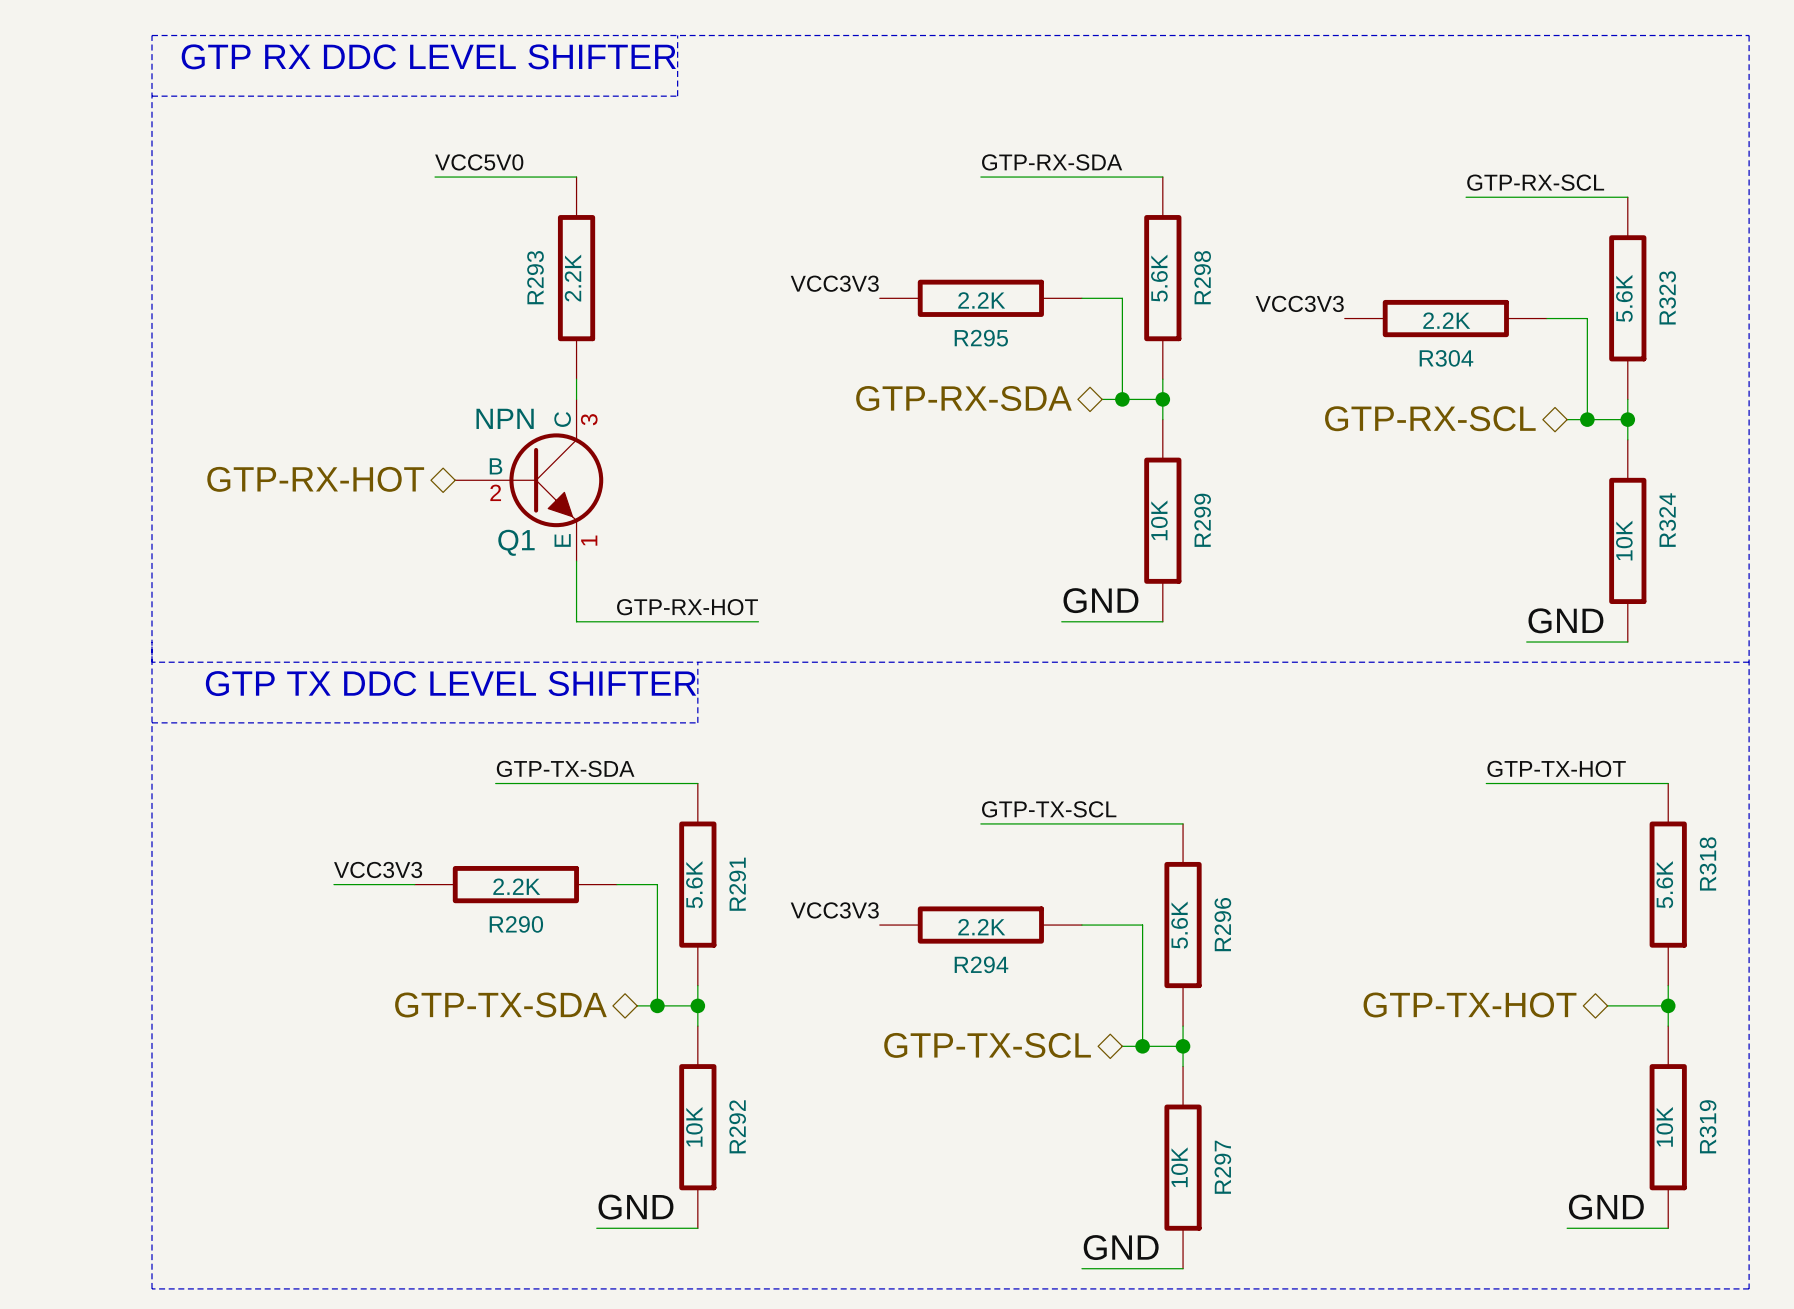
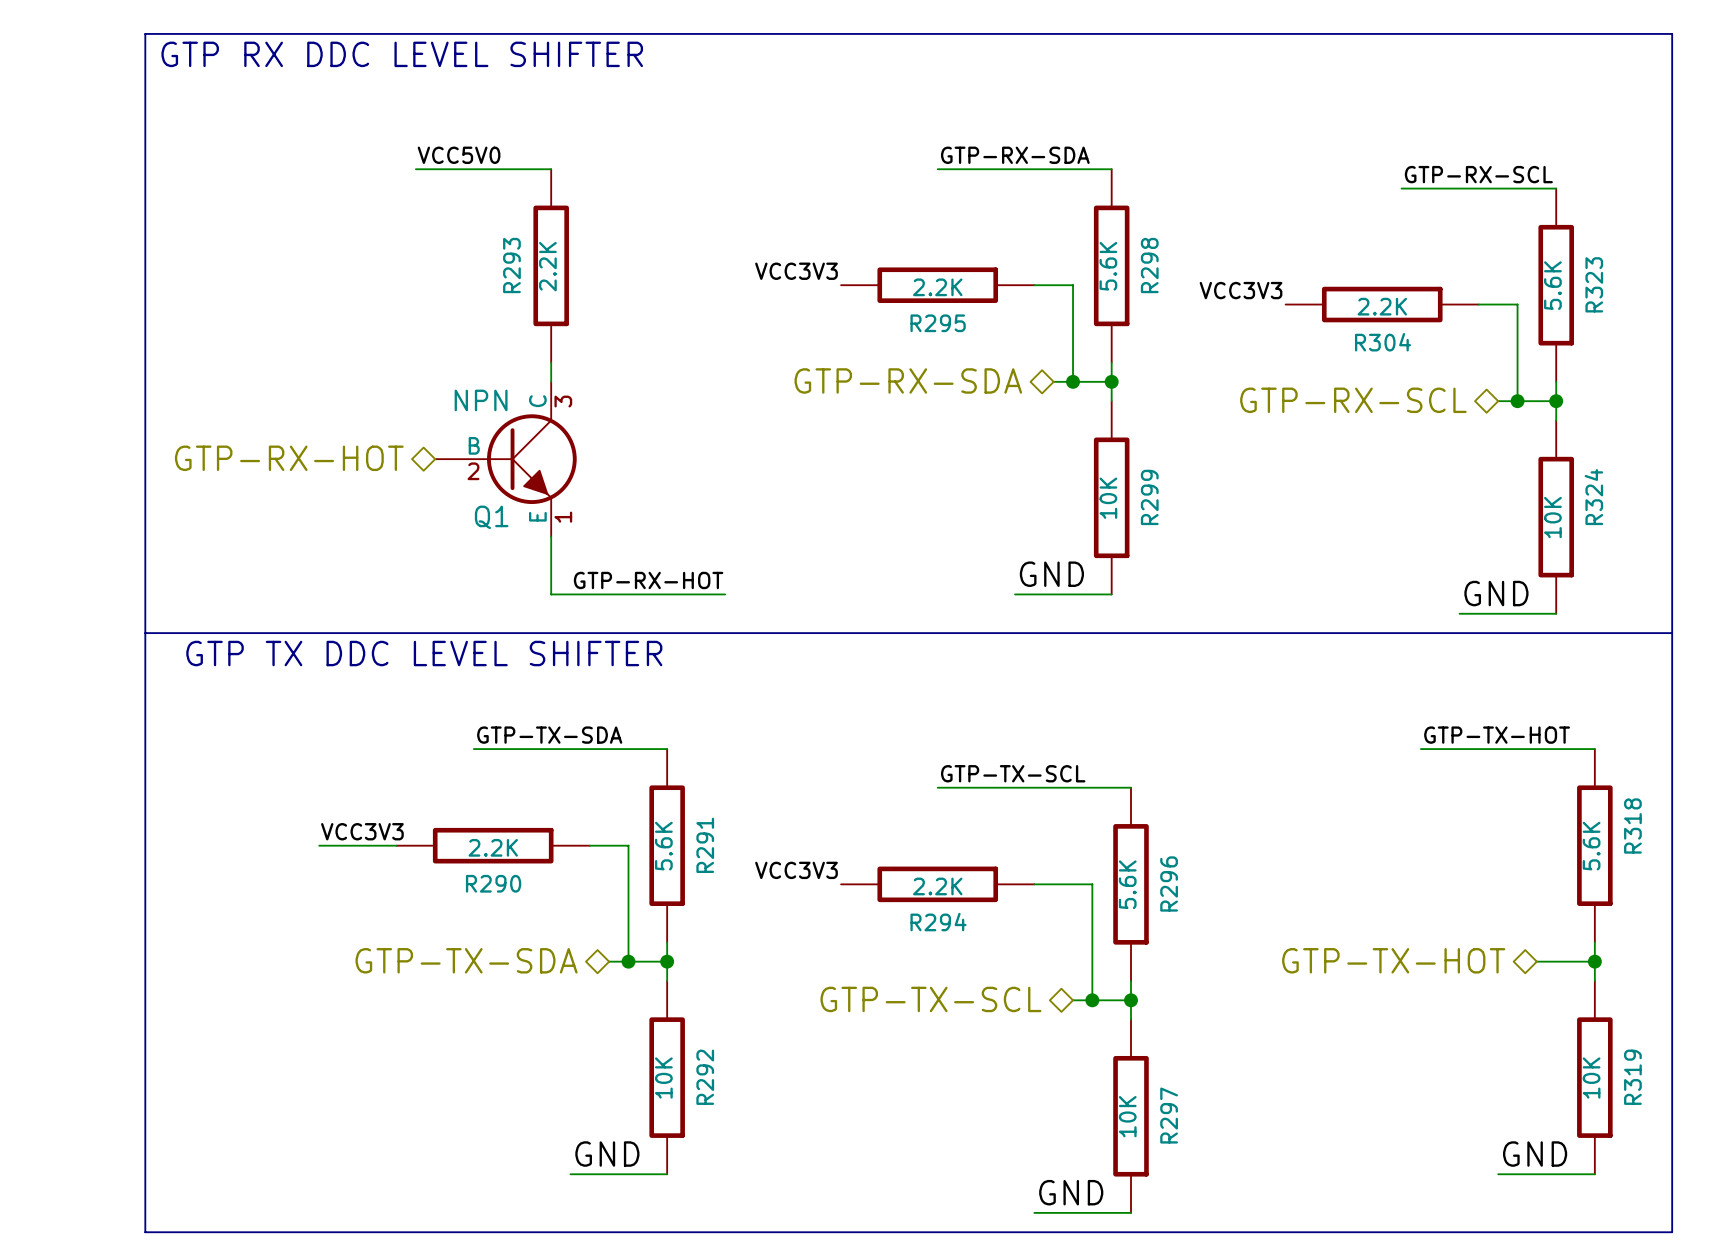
line: (152, 35) (1749, 35) (1749, 1288) (152, 1288) (152, 35) -> none
bus: none -> (145, 33) (145, 1232) (1672, 1232) (1672, 33) (145, 33)
line: (677, 35) (677, 96) (152, 96) -> none
line: (152, 662) (1749, 662) -> none
bus: none -> (145, 633) (1672, 633)
line: (697, 662) (697, 722) (152, 722) -> none

